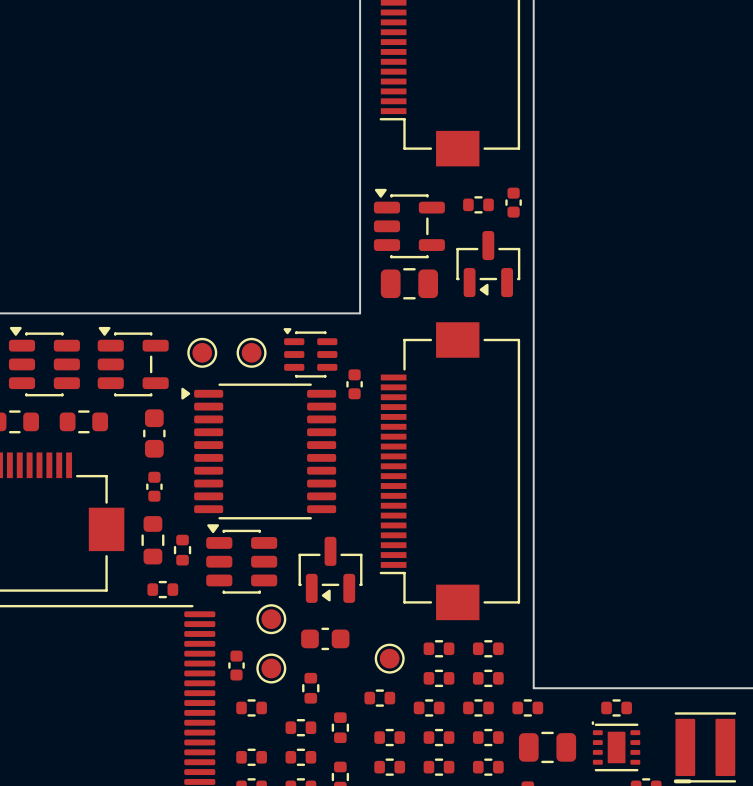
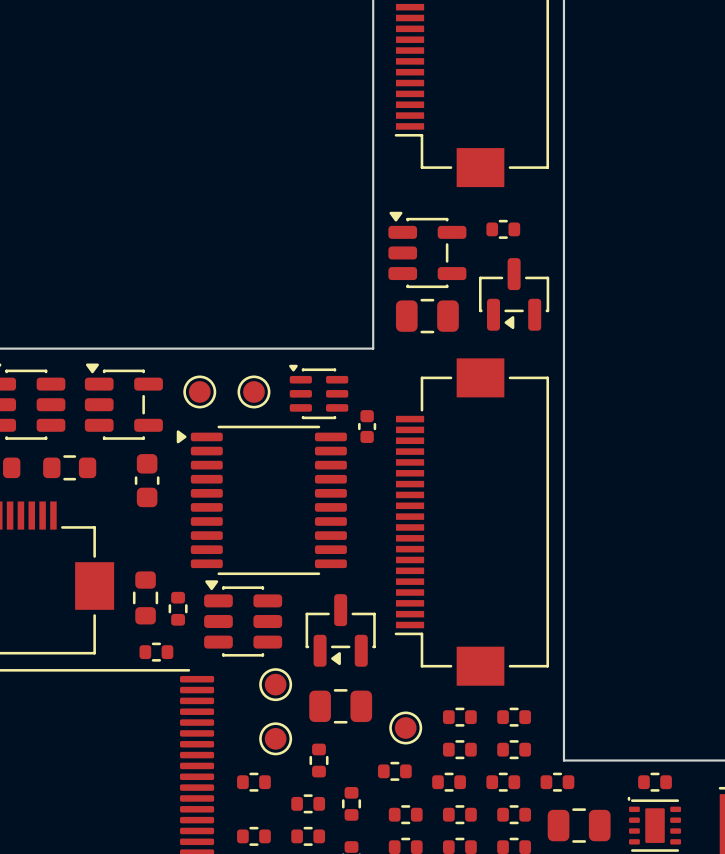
part: (513, 202) -> none
part: (154, 486) -> none
part footprint: [301, 627, 350, 651] -> [309, 689, 373, 724]
part: (236, 665) -> none

